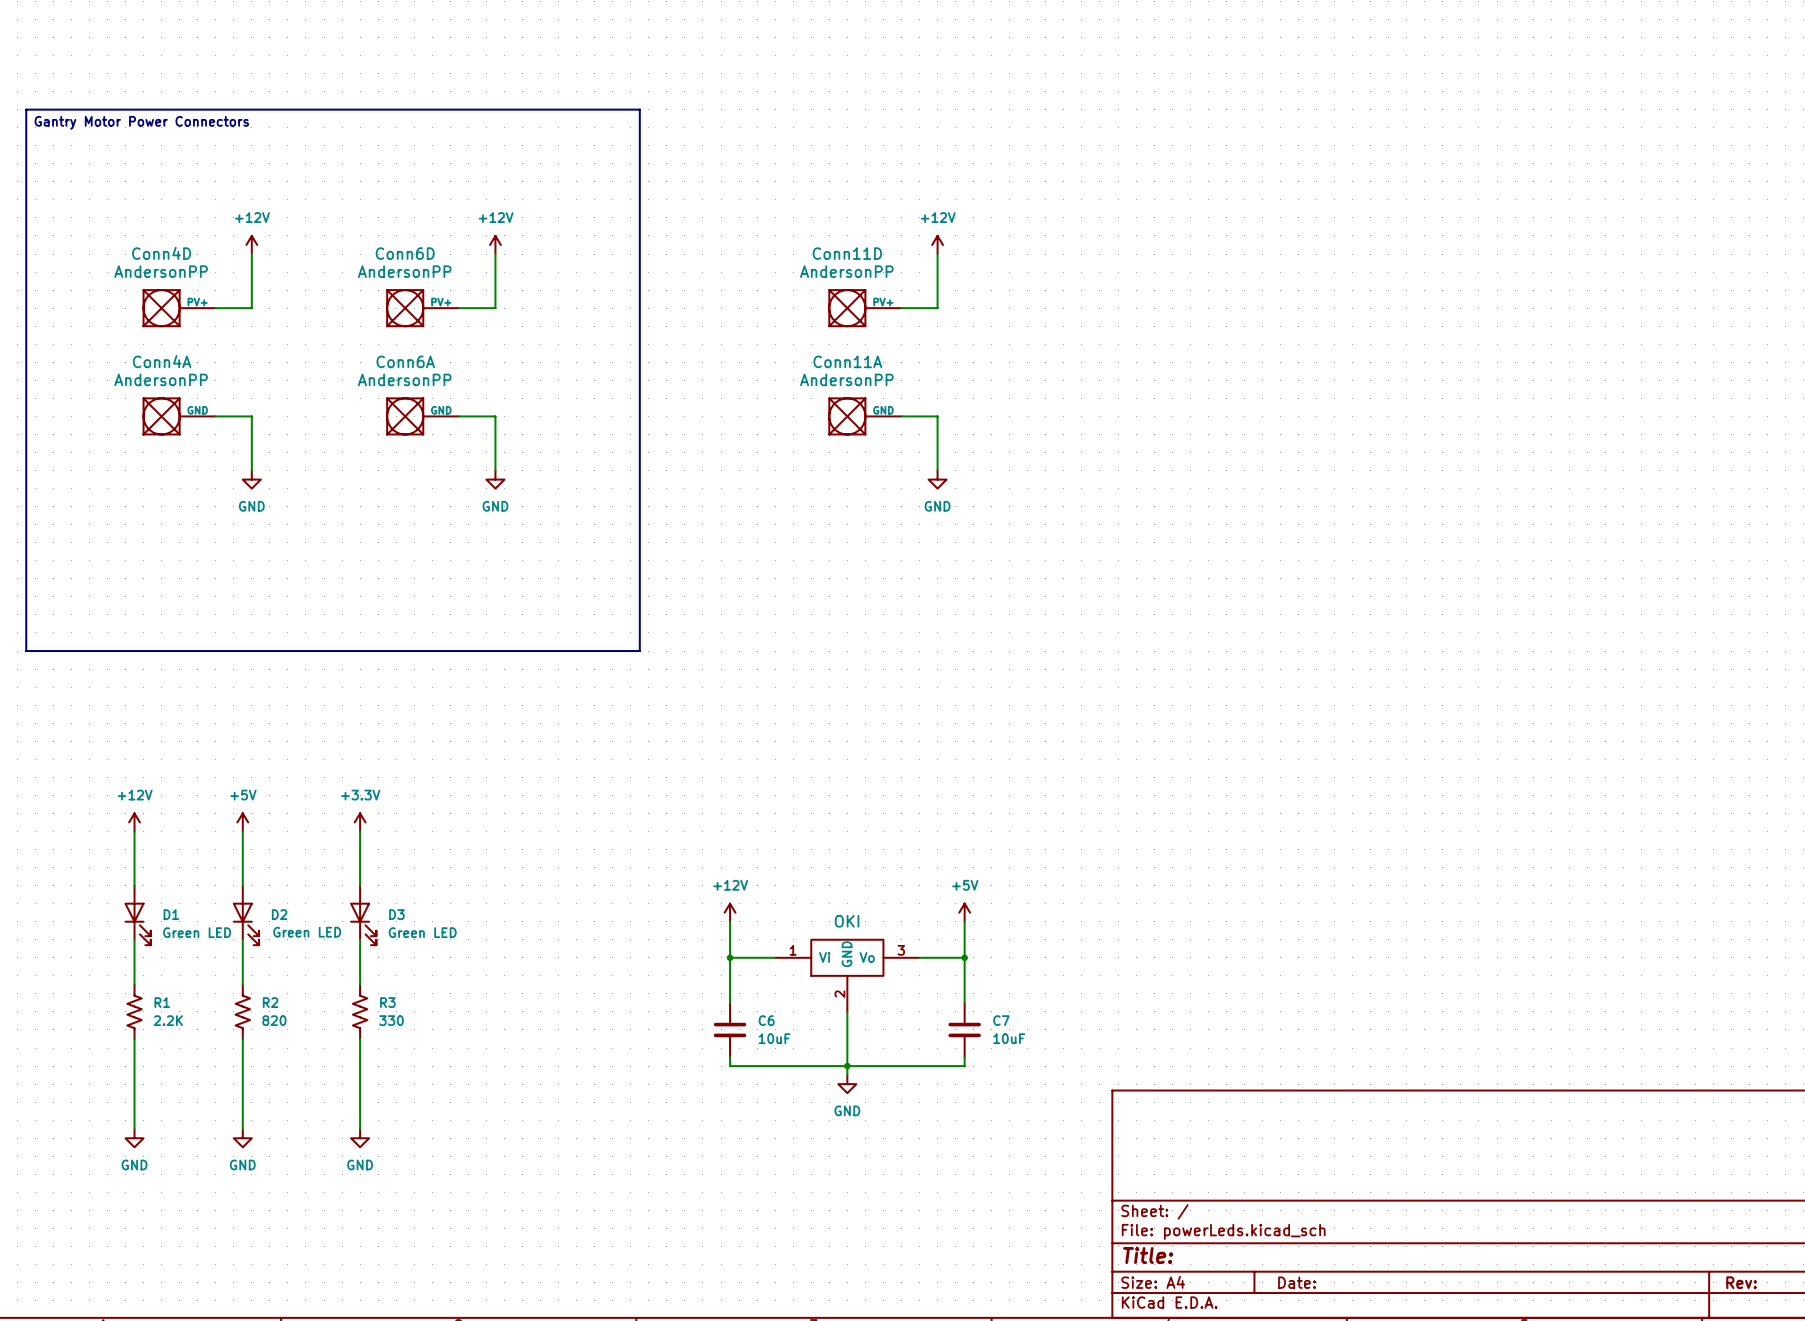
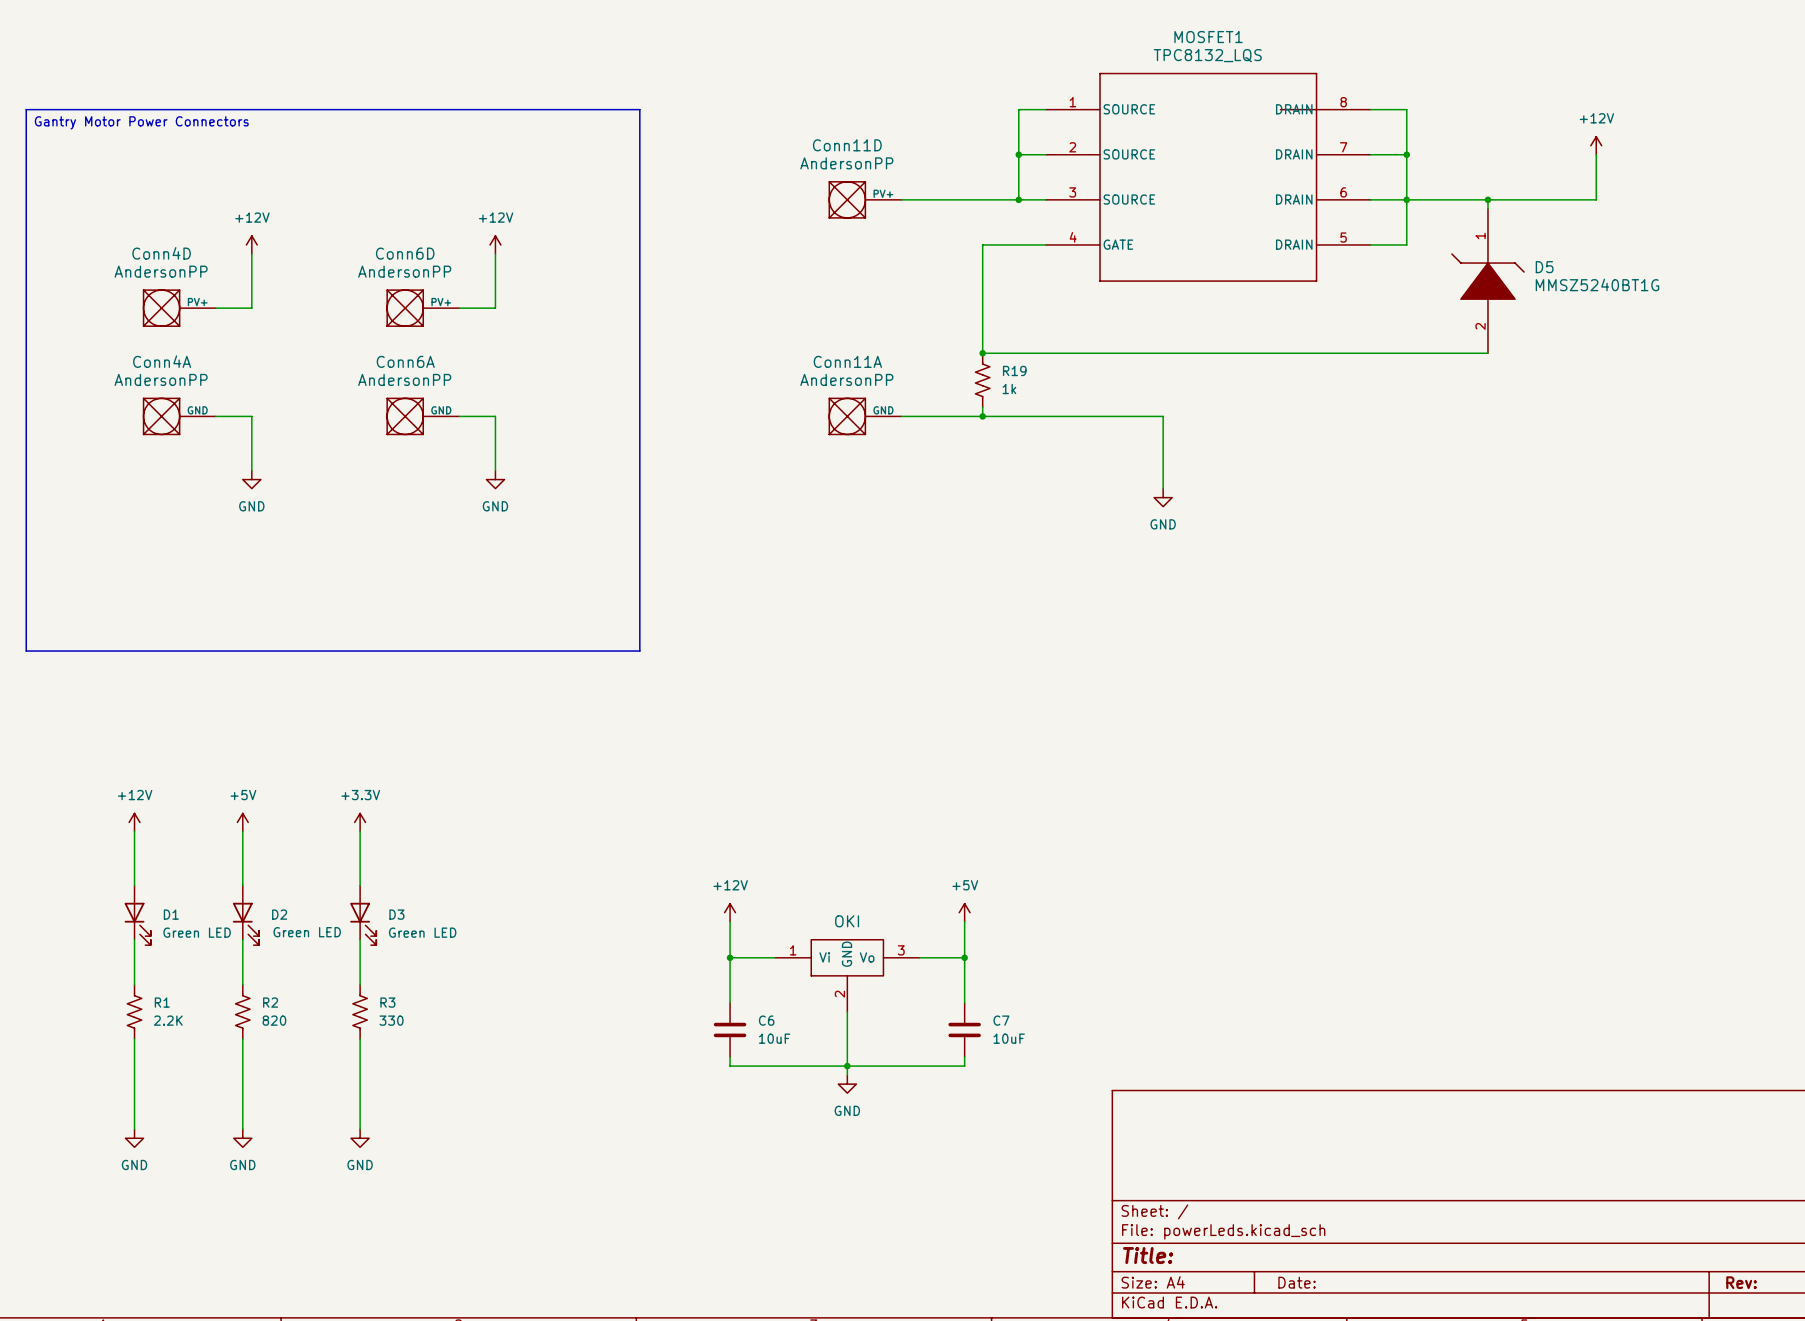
wire: none -> (1045, 109) (1018, 109) (1018, 199)
wire: none -> (1370, 109) (1406, 109) (1406, 244) (1370, 244)
power symbol: none -> +12V (1596, 145)
wire: none -> (1018, 154) (1045, 154)
junction: none -> (1018, 154)
wire: none -> (1370, 154) (1406, 154)
junction: none -> (1406, 154)
wire: none -> (1596, 154) (1596, 199) (1370, 199)
MOSFET1: none -> TPC8132_LQS (1208, 177)
wire: none -> (901, 199) (1045, 199)
junction: none -> (1018, 199)
junction: none -> (1406, 199)
wire: none -> (1487, 199) (1487, 208)
junction: none -> (1487, 199)
power symbol: +12V (937, 244) -> none
wire: none -> (1045, 244) (982, 244) (982, 353) (1487, 353)
wire: (937, 254) (937, 308) (901, 308) -> none
D5: none -> MMSZ5240BT1G (1487, 281)
Conn11D position: (865, 308) -> (865, 199)
junction: none -> (982, 353)
R19: none -> 1k (982, 380)
wire: none -> (982, 407) (982, 416)
wire: (937, 416) (937, 470) -> (937, 416) (1163, 416) (1163, 488)
junction: none -> (982, 416)
power symbol: GND (937, 479) -> none
power symbol: none -> GND (1163, 497)

